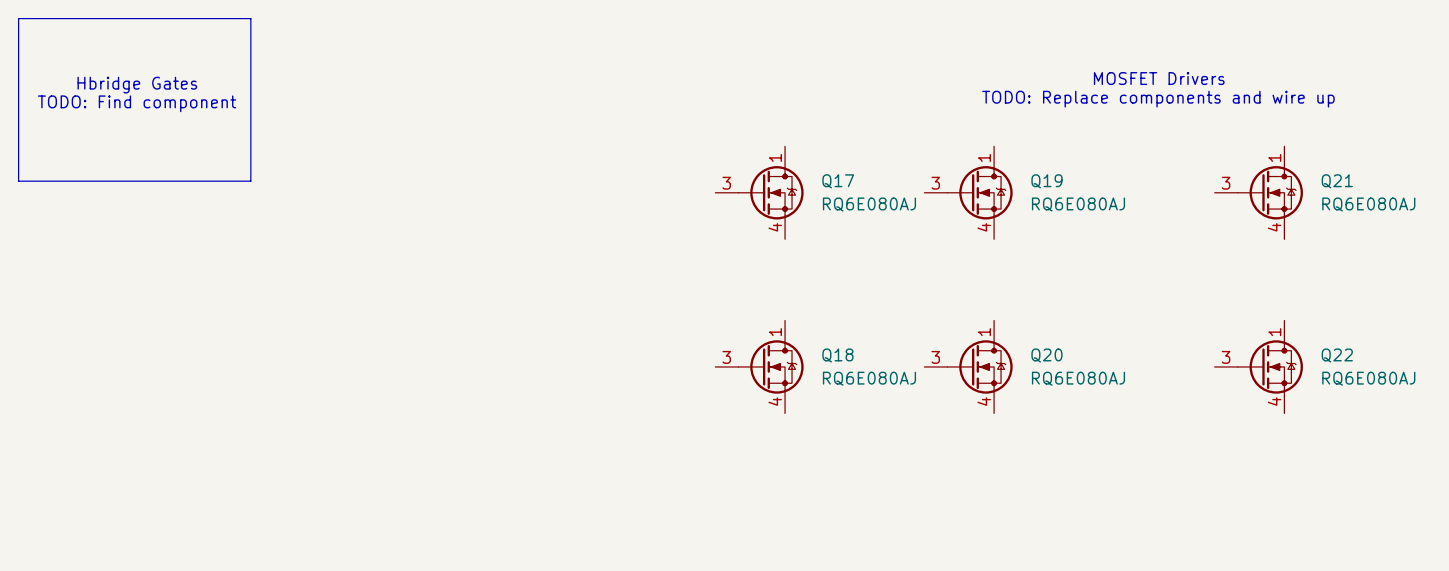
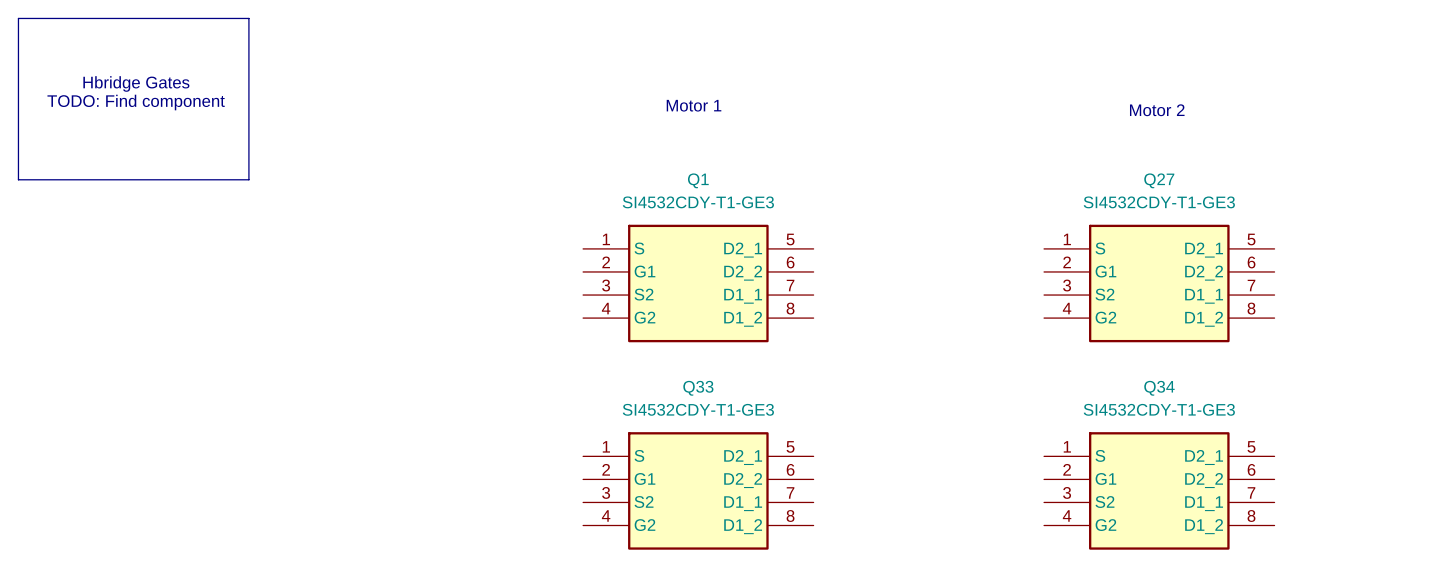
text: MOSFET Drivers (1159, 78) -> none
text: TODO: Replace components and wire up (1158, 99) -> none
text: none -> Motor 1 (694, 105)
text: none -> Motor 2 (1157, 110)
Q17: RQ6E080AJ (759, 192) -> none
Q19: RQ6E080AJ (968, 192) -> none
Q21: RQ6E080AJ (1258, 192) -> none
Q1: none -> SI4532CDY-T1-GE3 (698, 283)
Q27: none -> SI4532CDY-T1-GE3 (1159, 283)
Q18: RQ6E080AJ (759, 366) -> none
Q20: RQ6E080AJ (968, 366) -> none
Q22: RQ6E080AJ (1258, 366) -> none
Q33: none -> SI4532CDY-T1-GE3 (698, 490)
Q34: none -> SI4532CDY-T1-GE3 (1159, 490)

